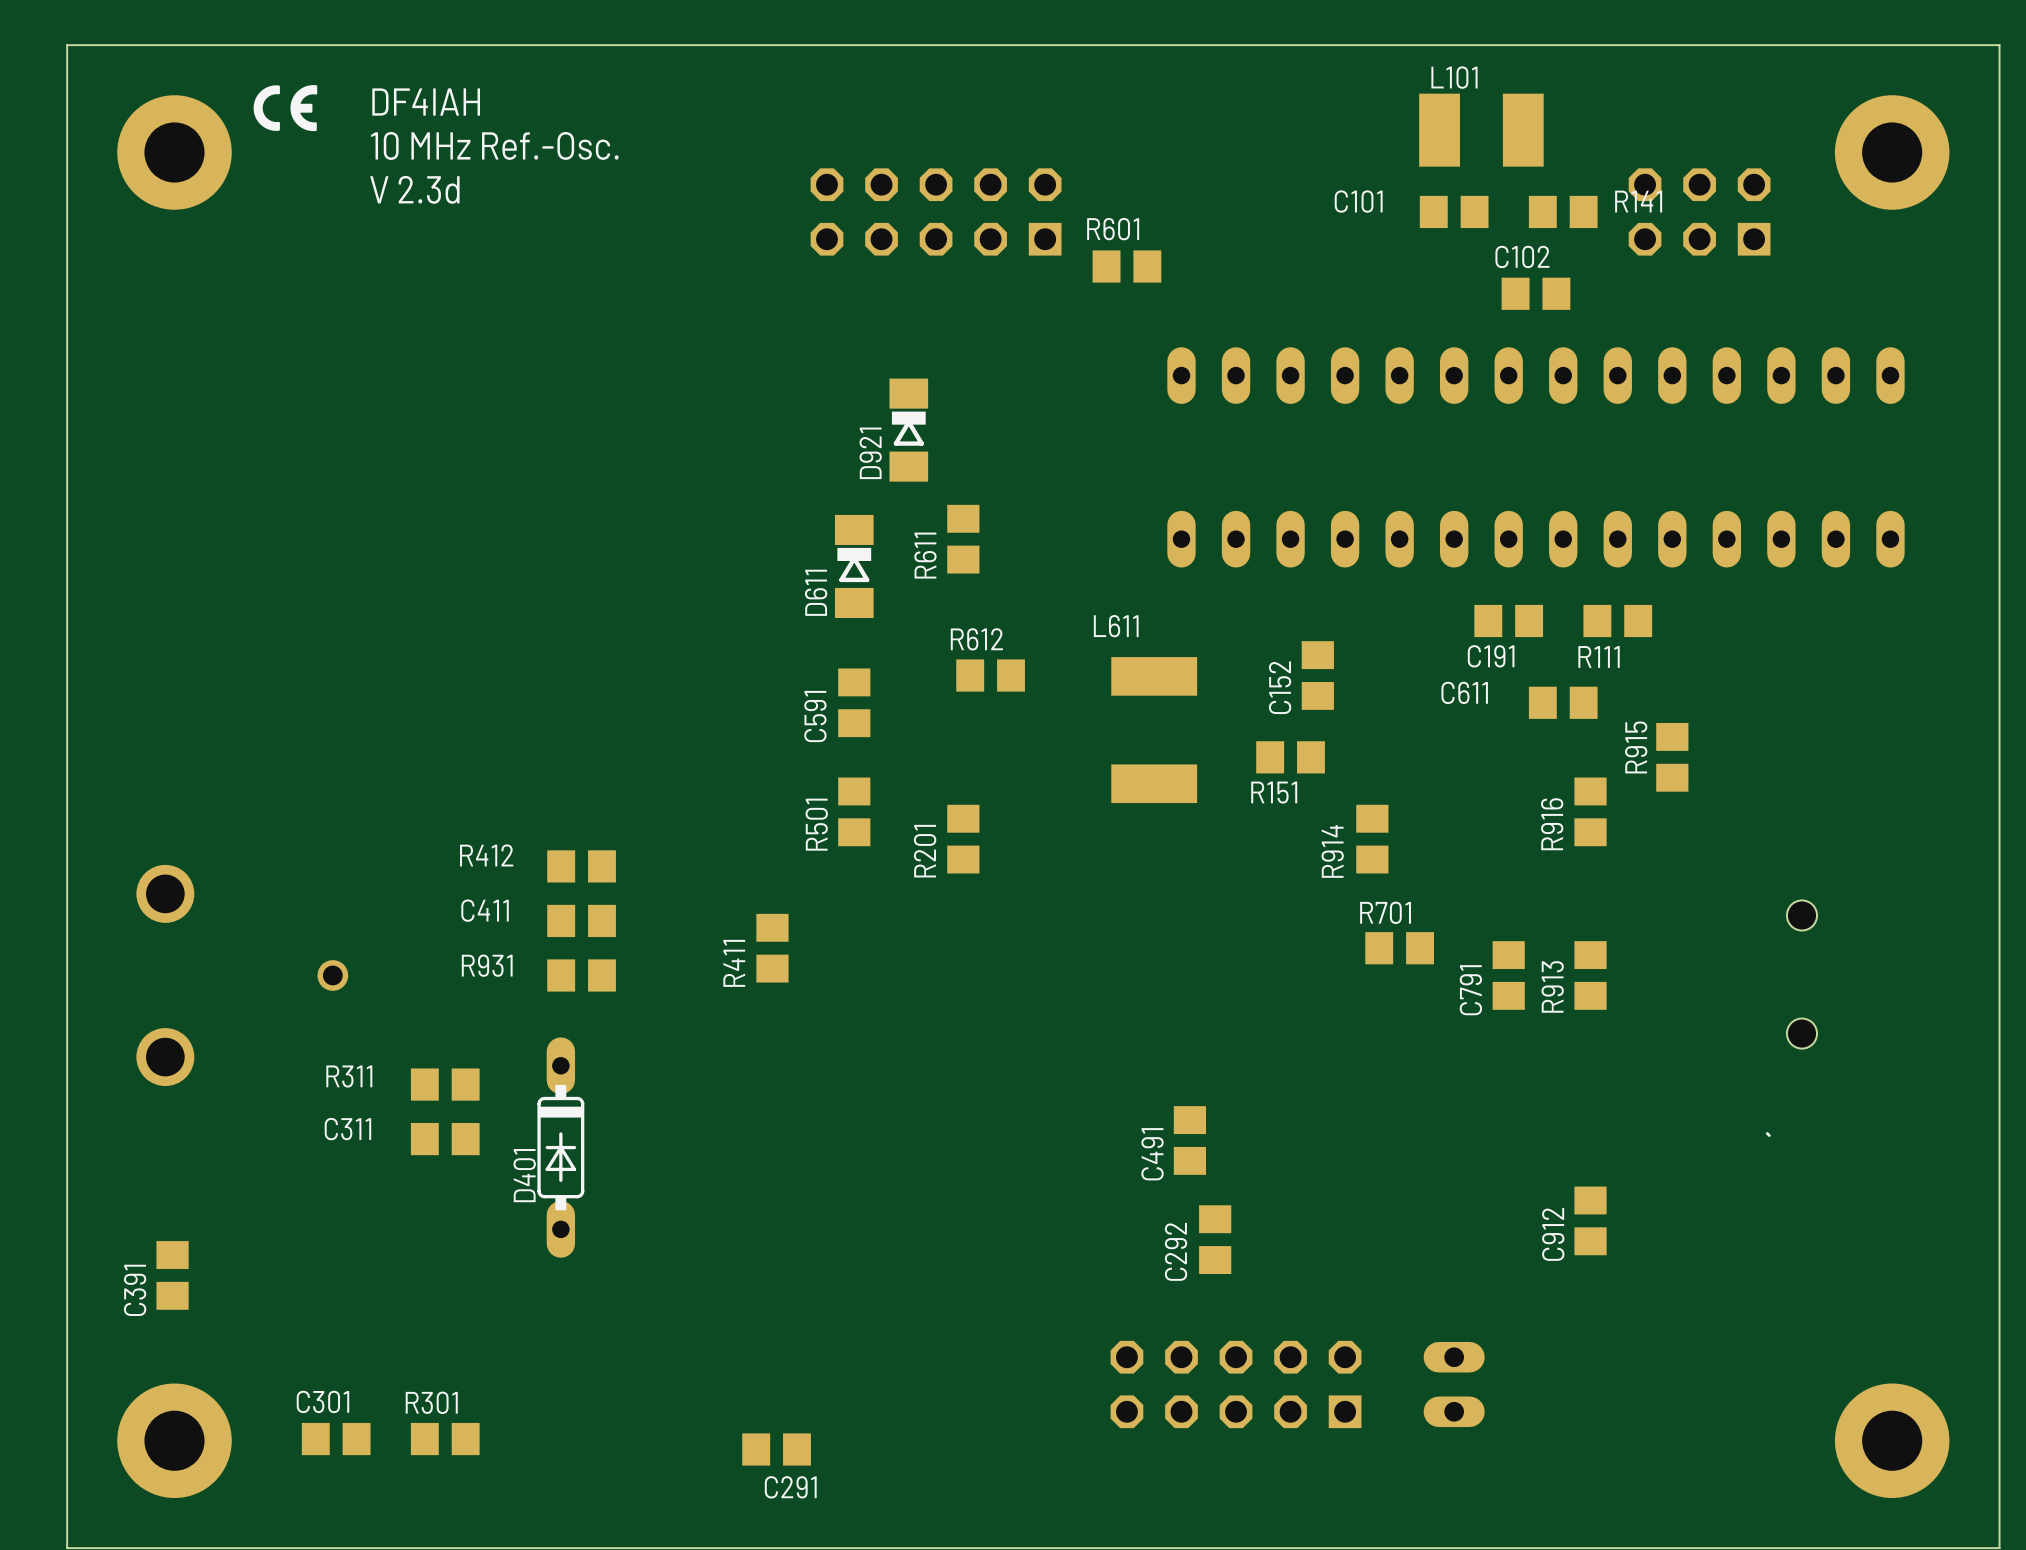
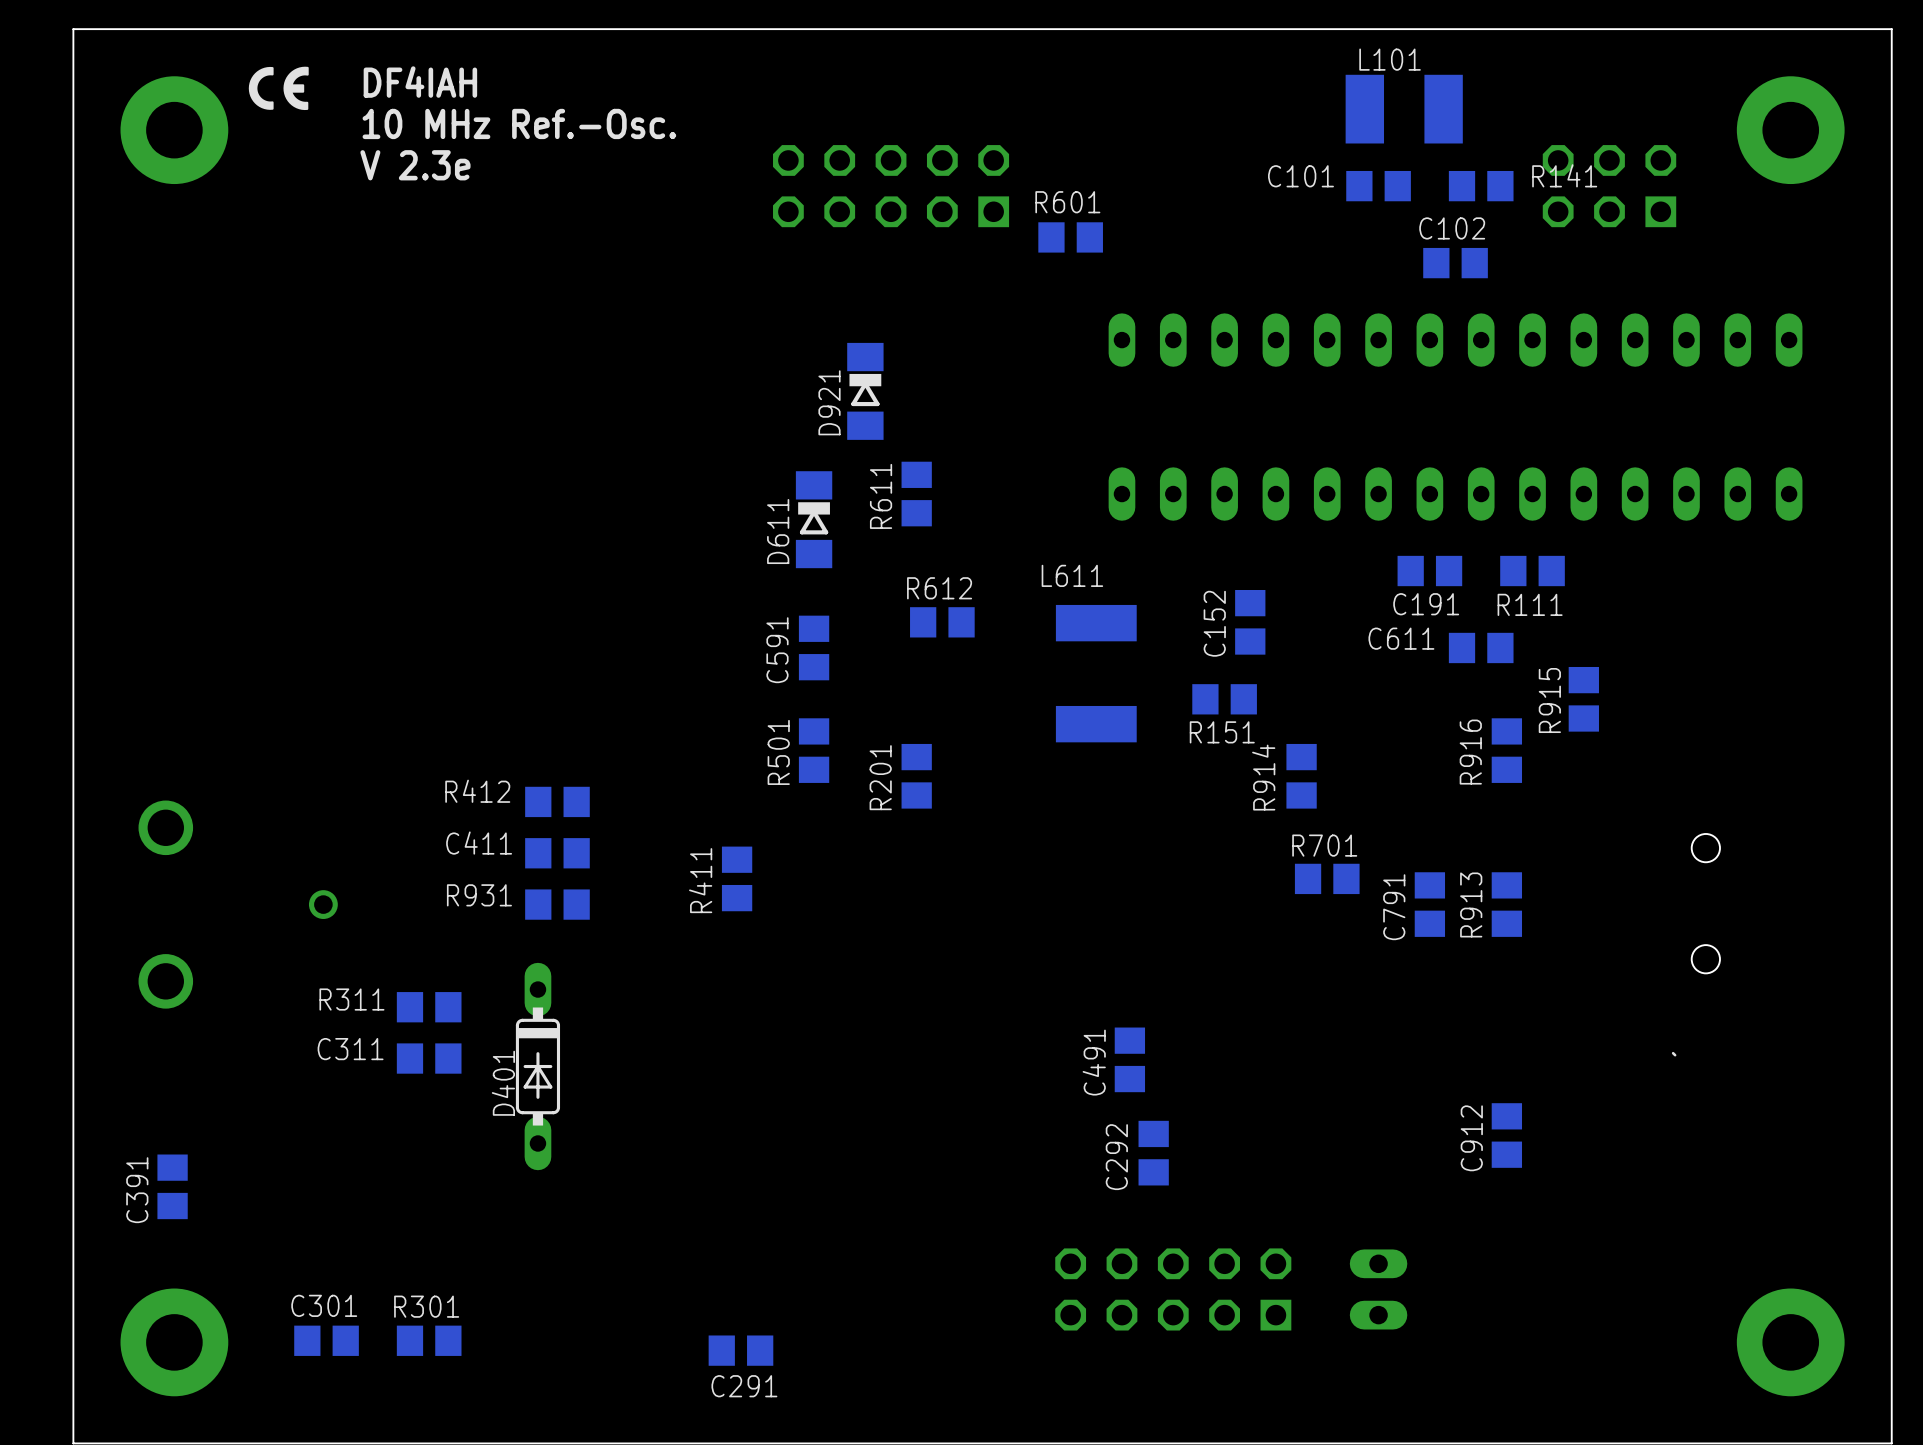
text: V 2.3d (414, 189) -> V 2.3e (415, 165)

